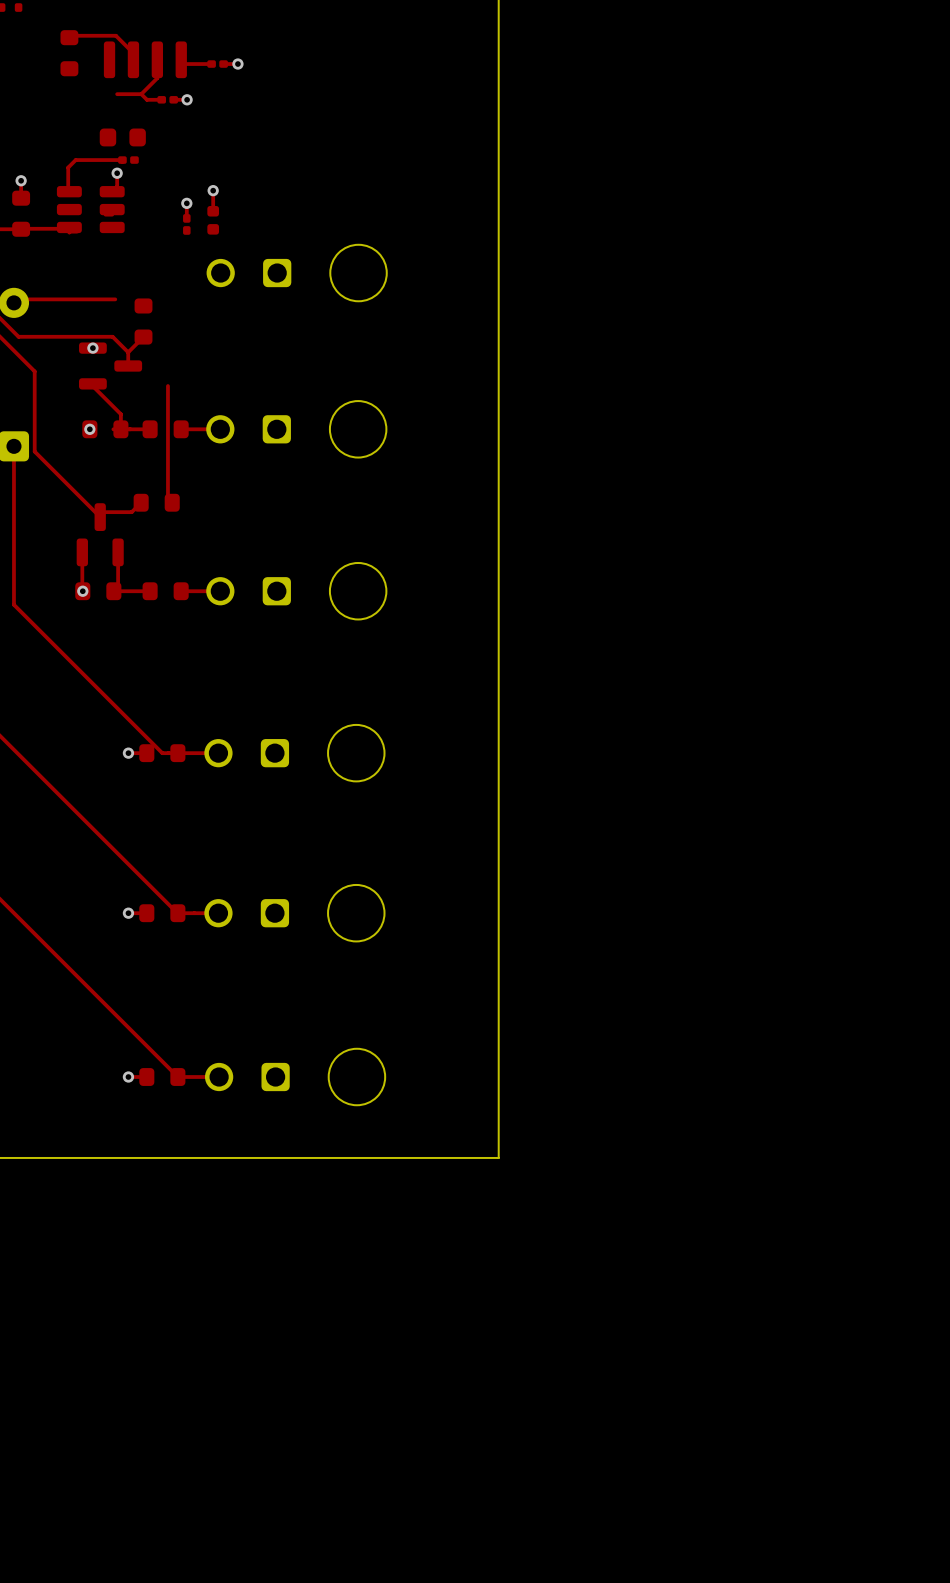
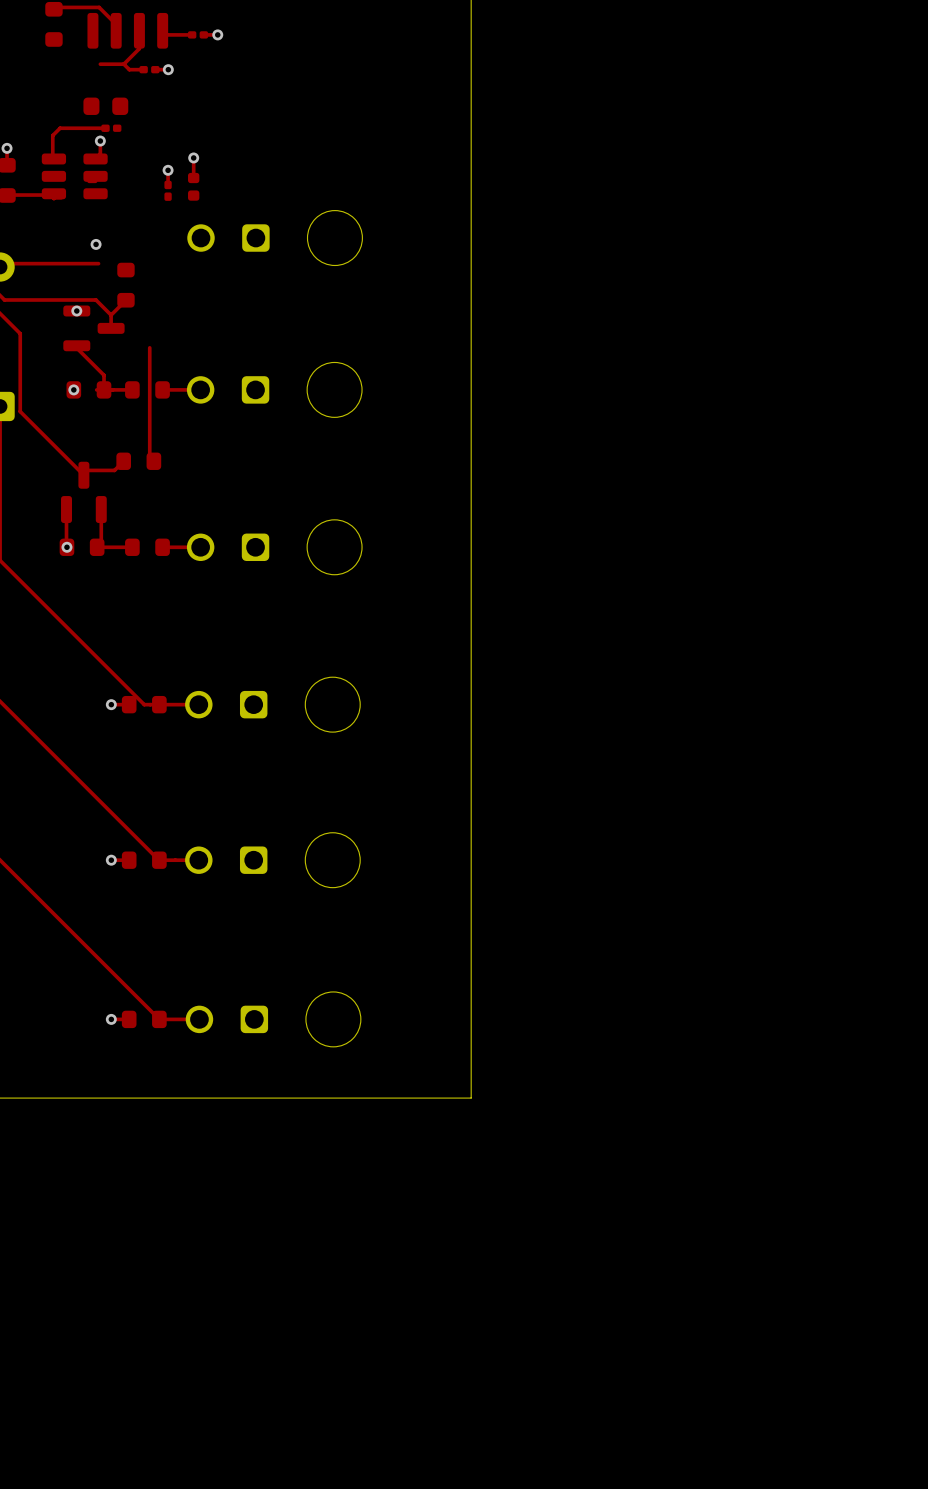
via: none -> (96, 244)

